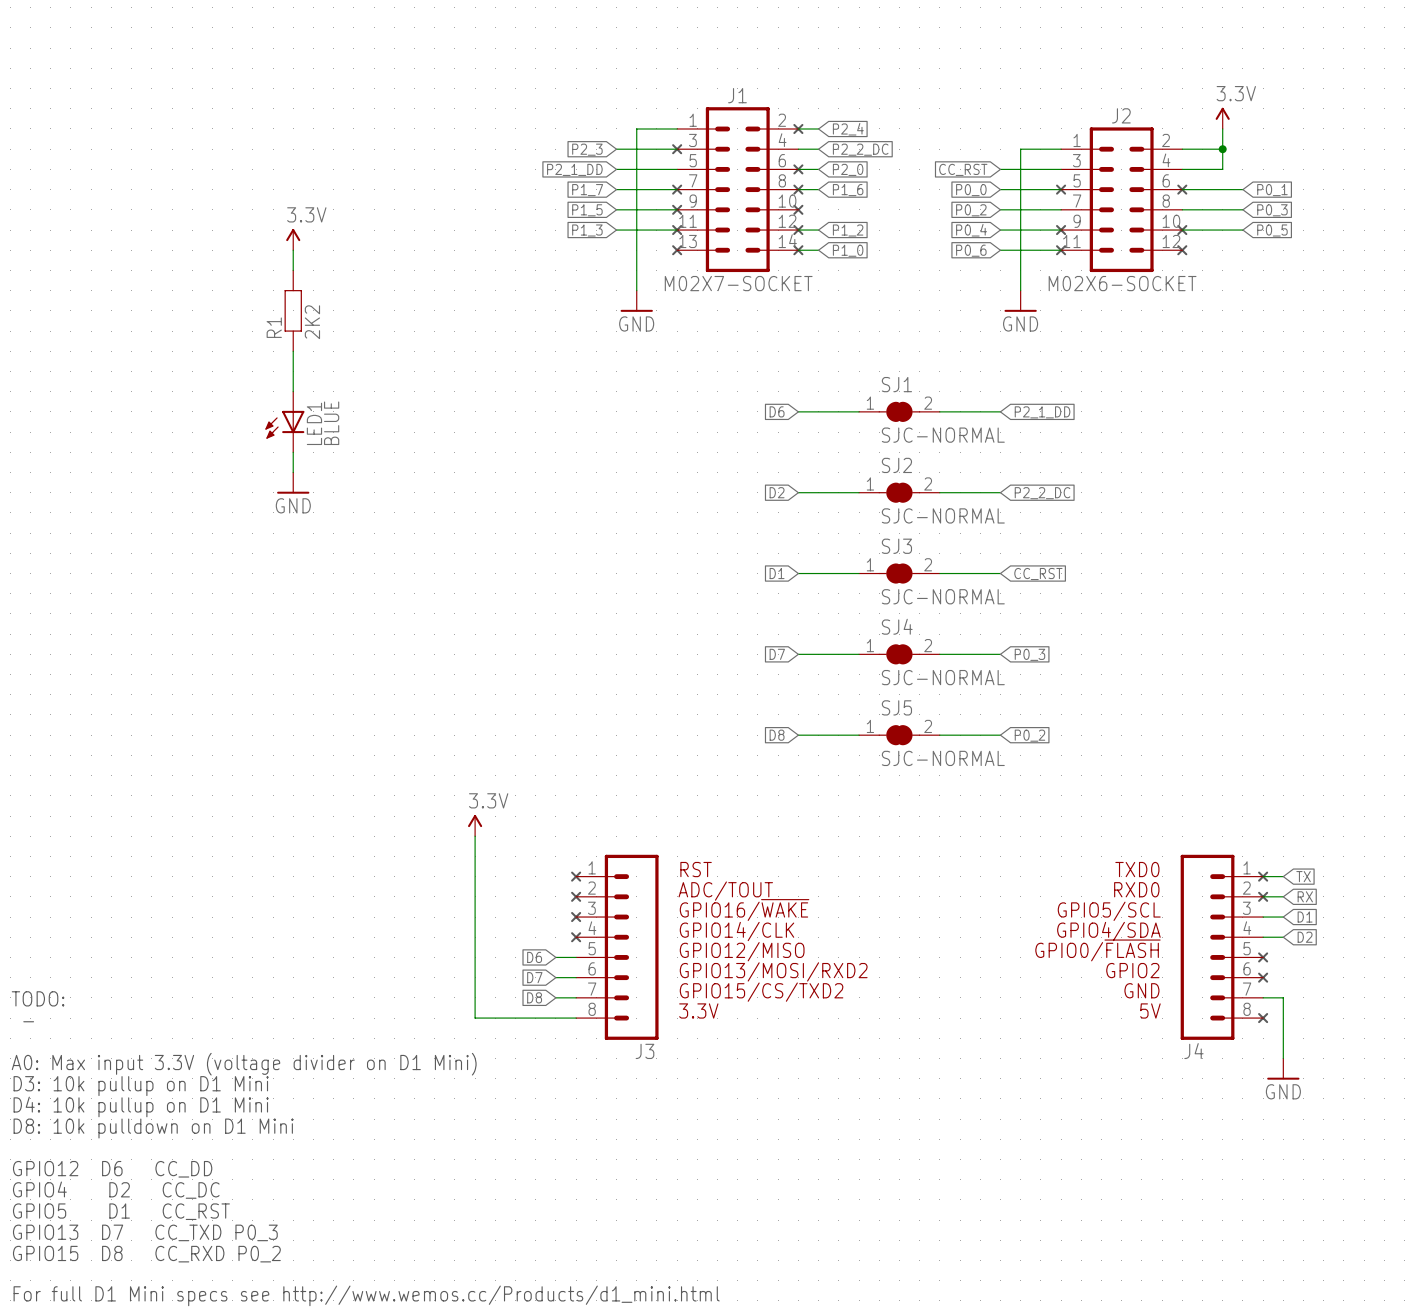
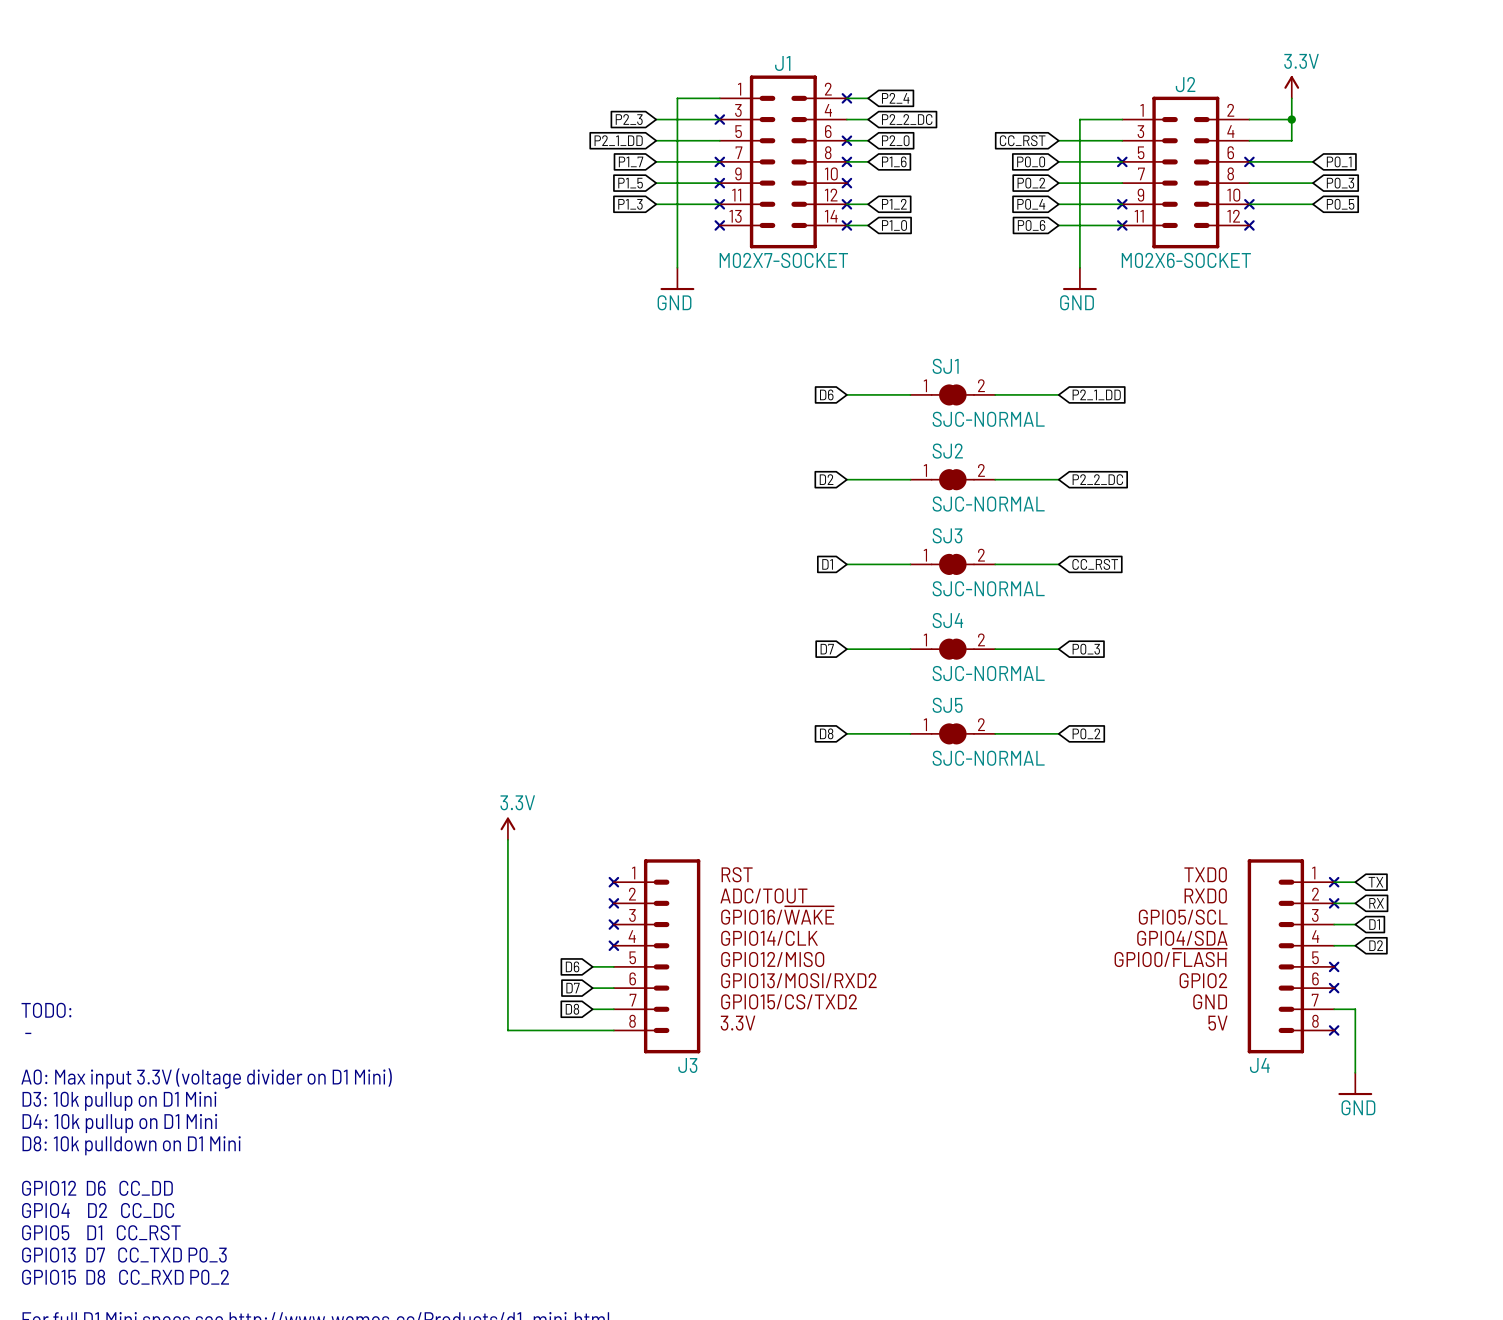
power symbol: 3.3V (293, 239) -> none
wire: (293, 250) (293, 270) -> none
R1: 2K2 (293, 310) -> none
wire: (293, 351) (293, 391) -> none
LED1: BLUE (284, 421) -> none
wire: (293, 452) (293, 472) -> none
power symbol: GND (293, 483) -> none

